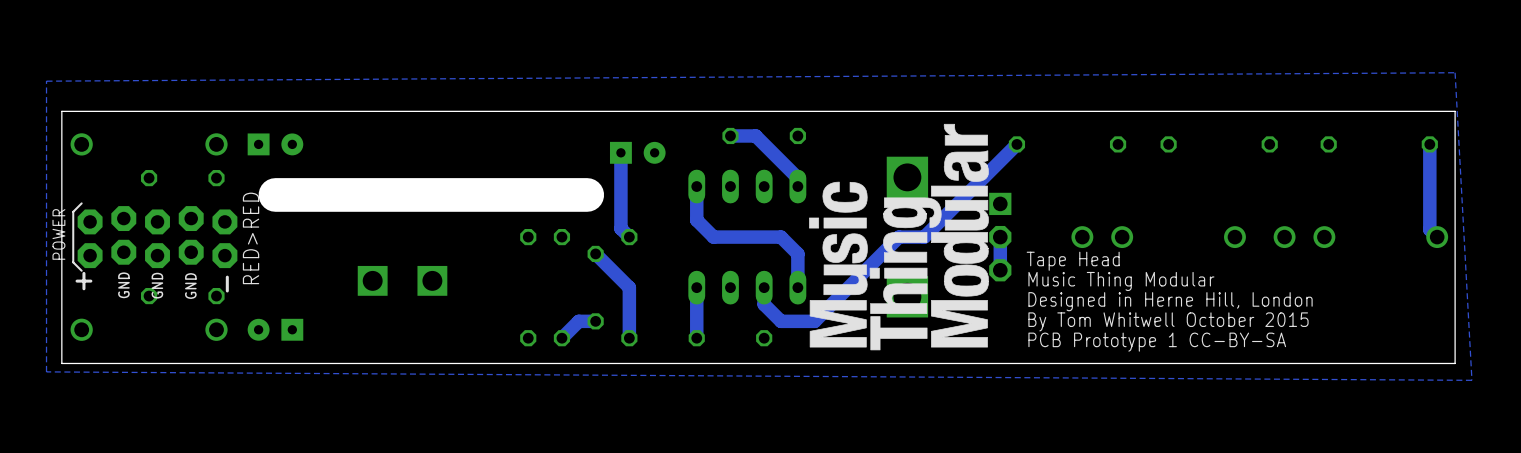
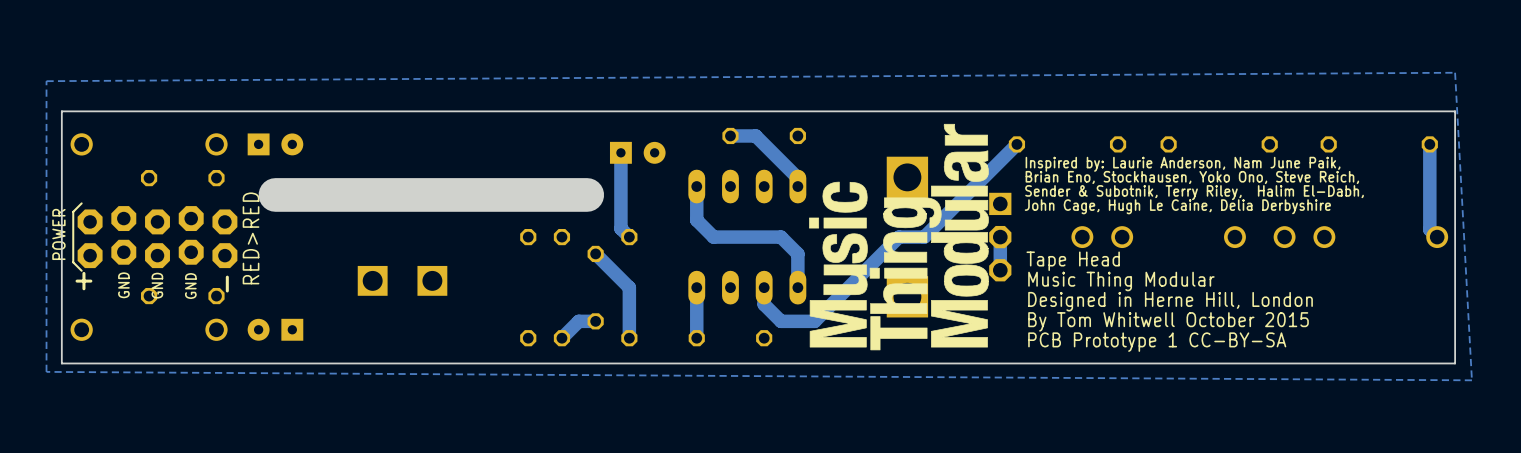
text: none -> Inspired by: Laurie Anderson, Nam June Paik, (1183, 164)
text: none -> Brian Eno, Stockhausen, Yoko Ono, Steve Reich, (1192, 177)
text: none -> Sender & Subotnik, Terry Riley, Halim El-Dabh, (1194, 192)
text: none -> John Cage, Hugh Le Caine, Delia Derbyshire (1177, 206)

